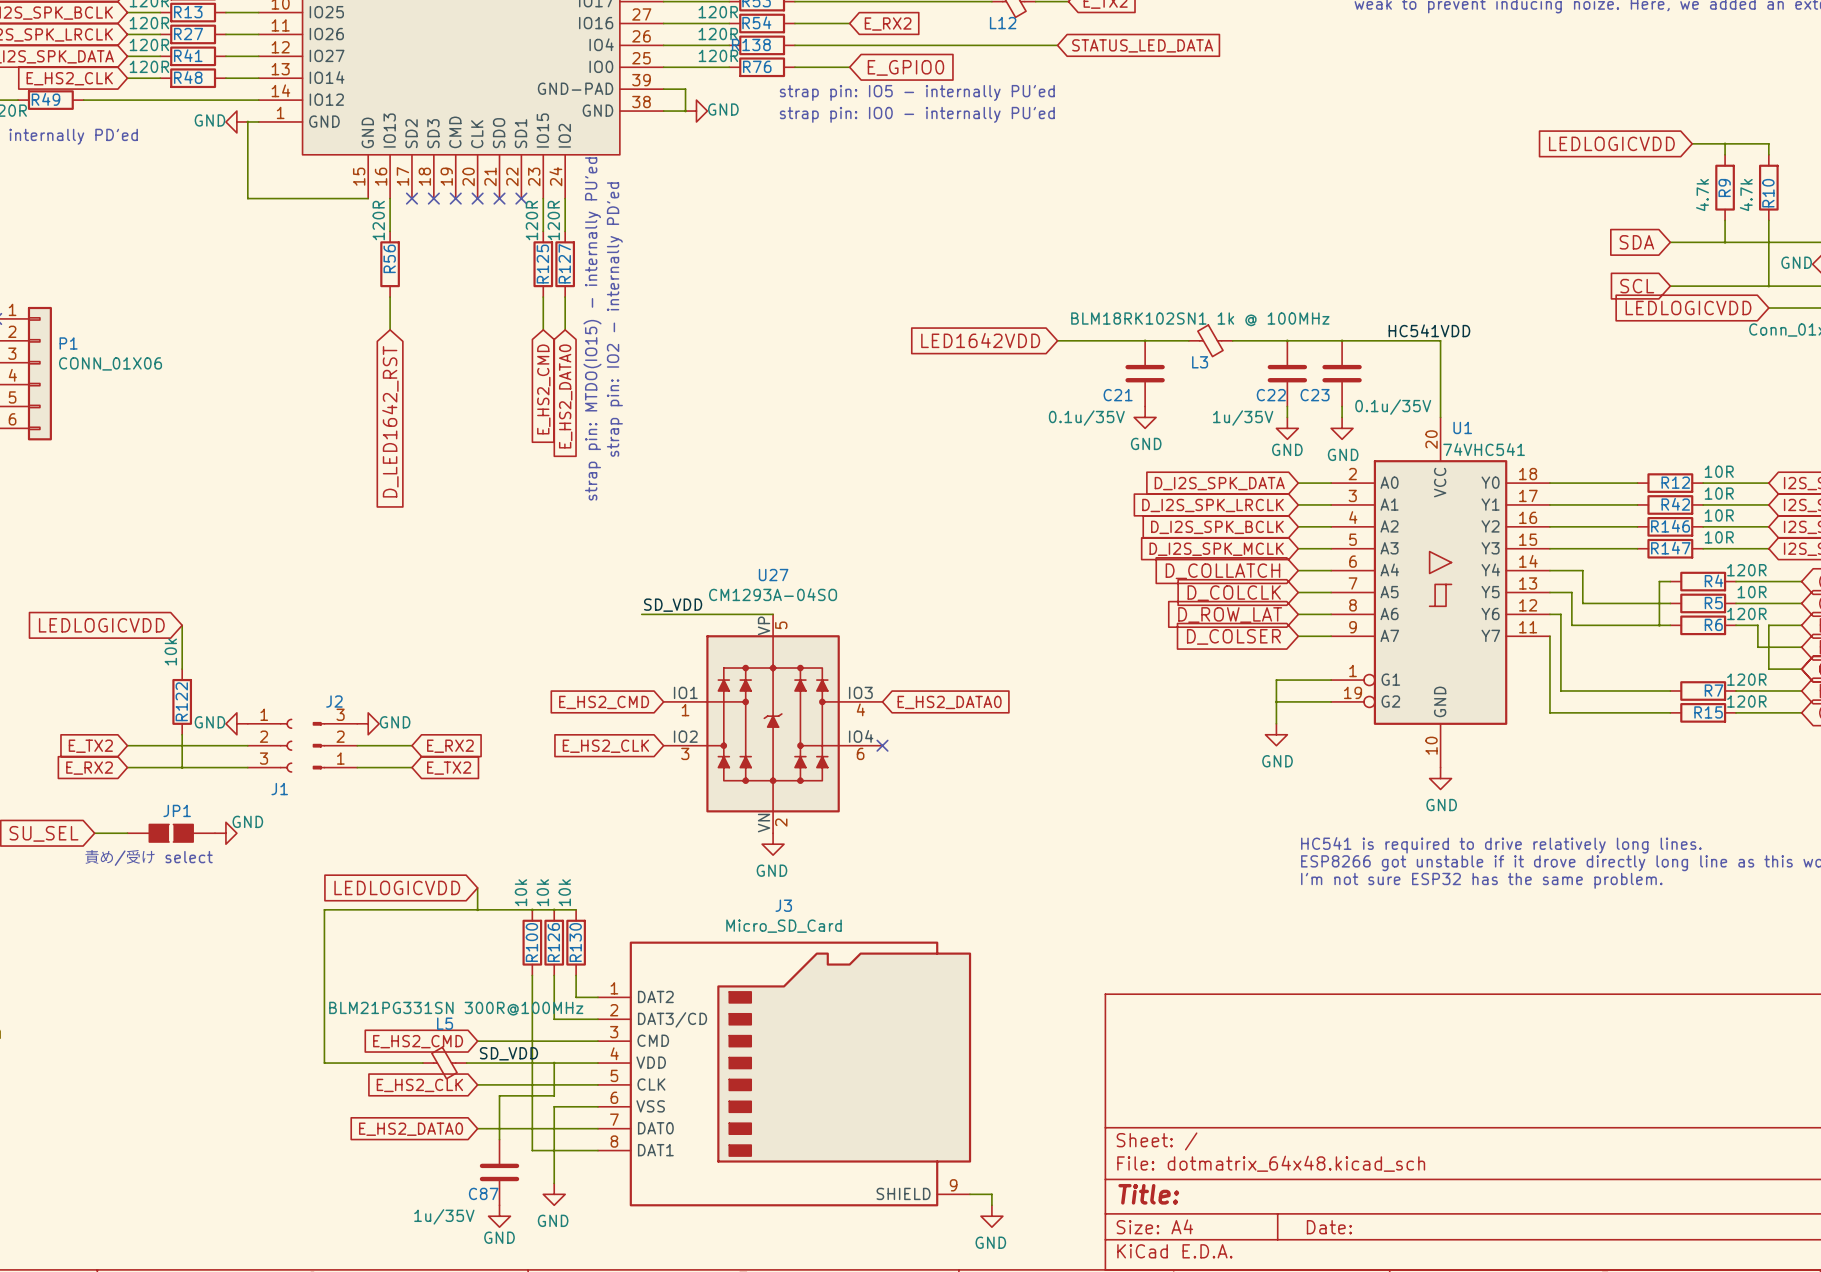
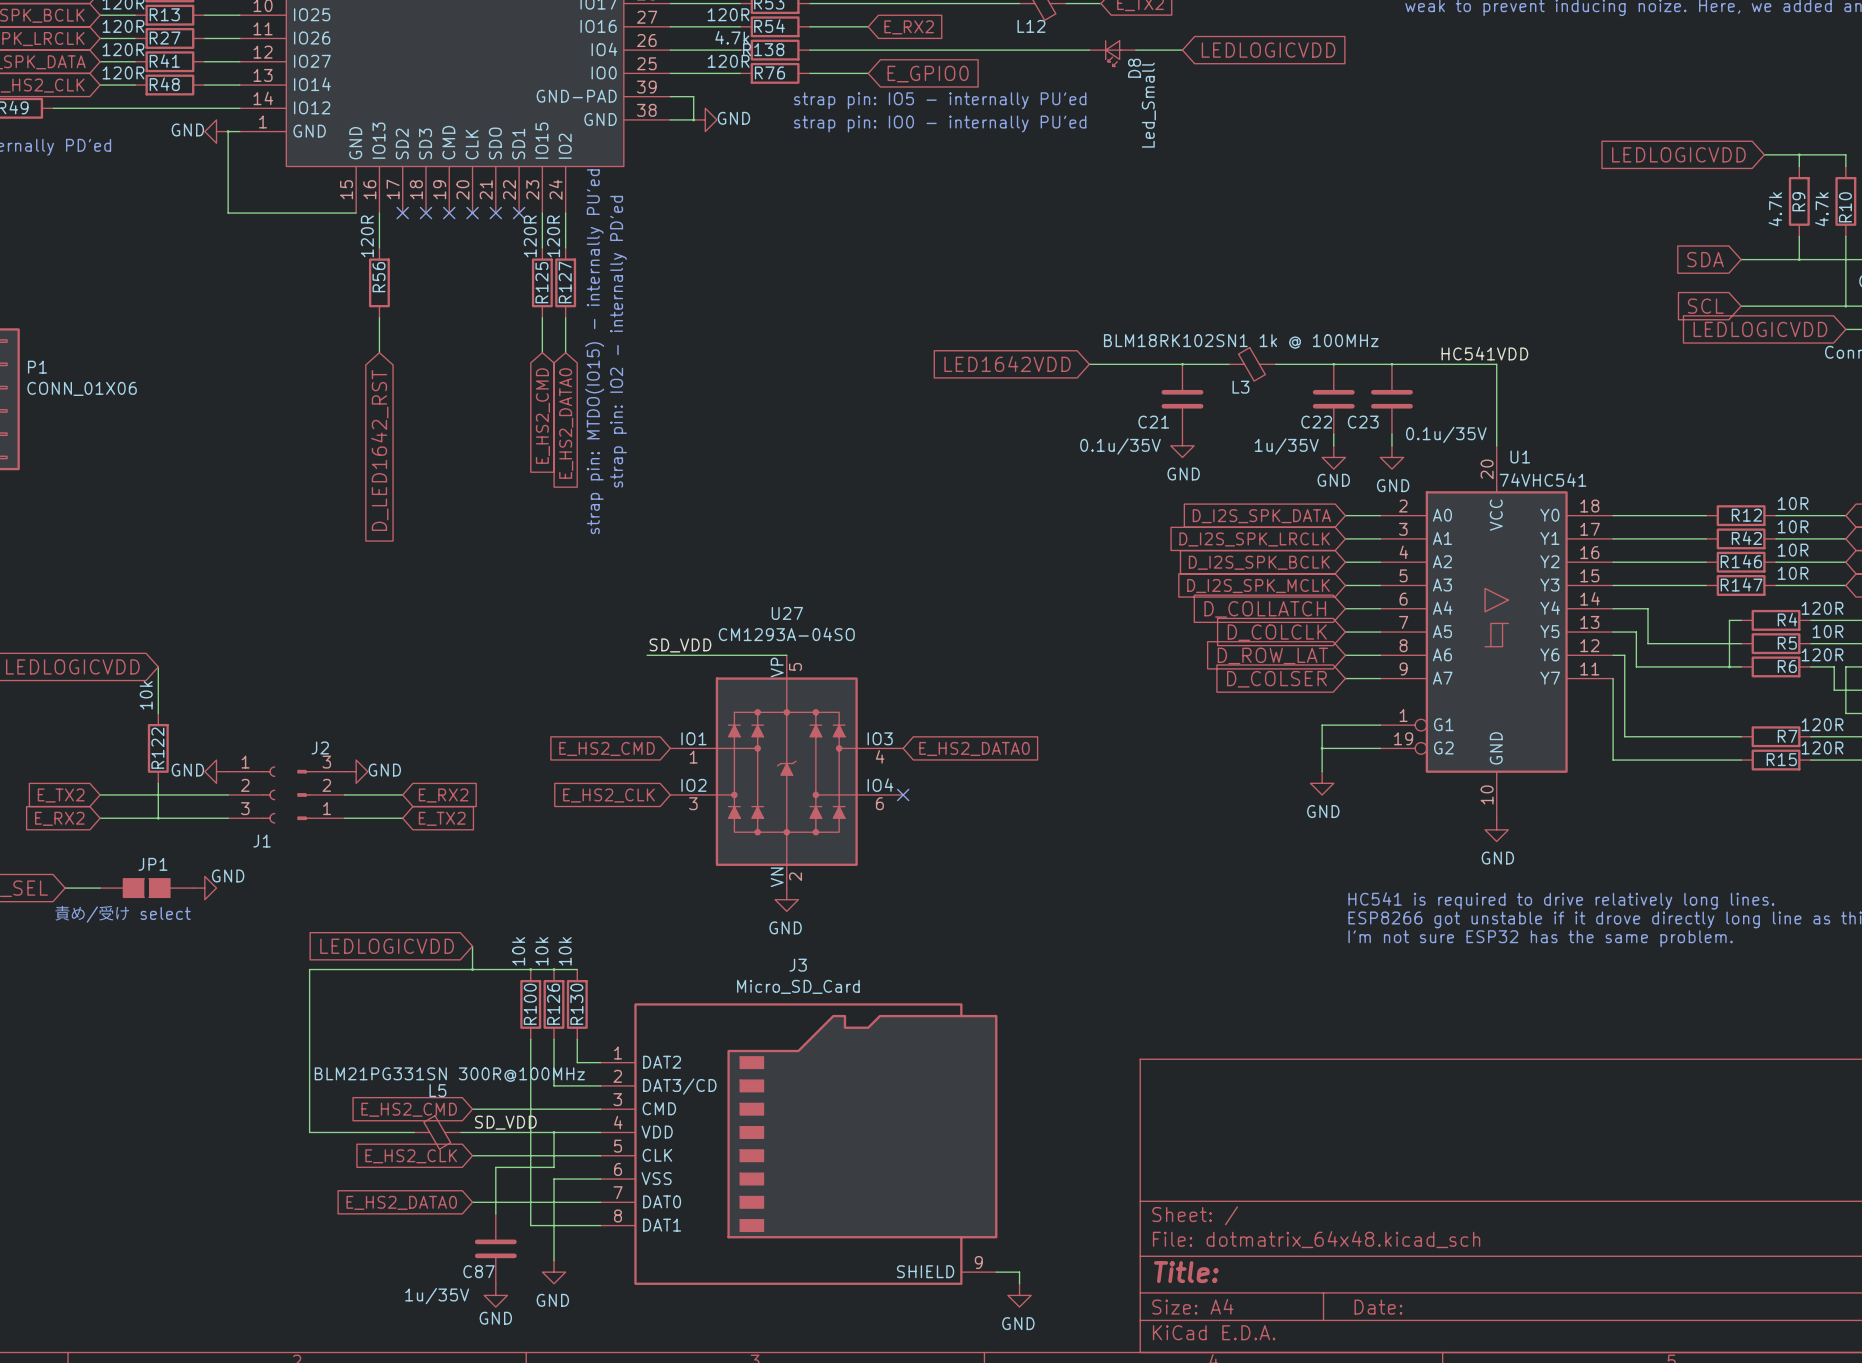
R138 value: 120R (718, 34) -> 4.7k (732, 37)
wire: none -> (1135, 50) (1182, 50)
global label: STATUS_LED_DATA (1142, 45) -> none
global label: none -> LEDLOGICVDD (1268, 50)
D8: none -> Led_Small (1112, 53)

